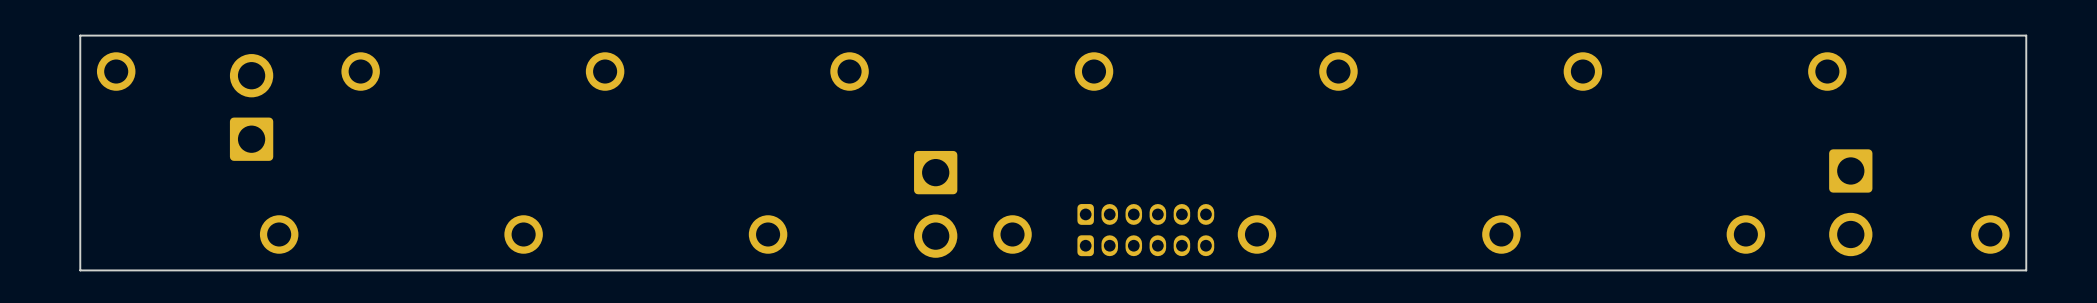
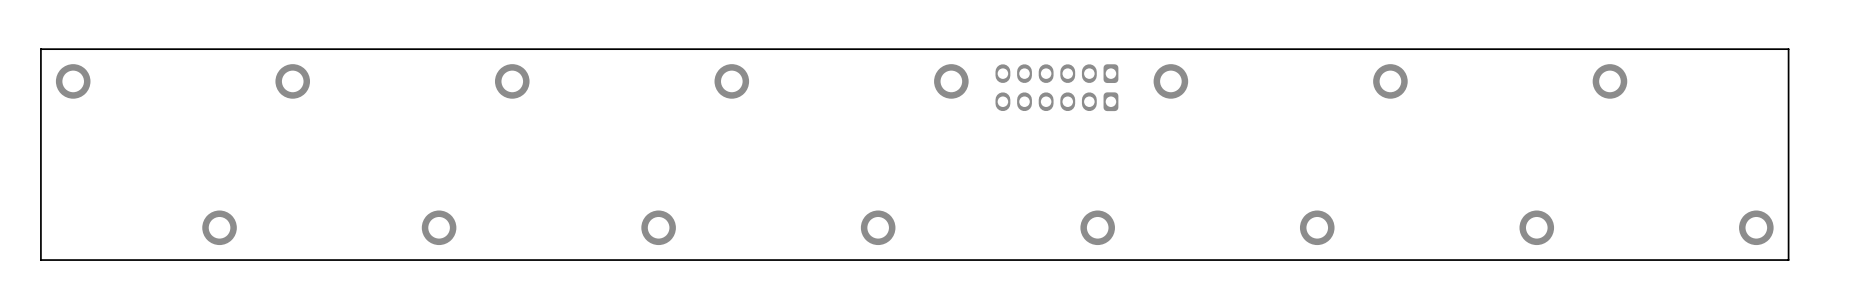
part: none -> (1056, 73)
part: none -> (1056, 101)
part: (251, 107) -> none
part: (1850, 202) -> none
part: (935, 204) -> none
part: (1145, 214) -> none
part: (1145, 245) -> none

